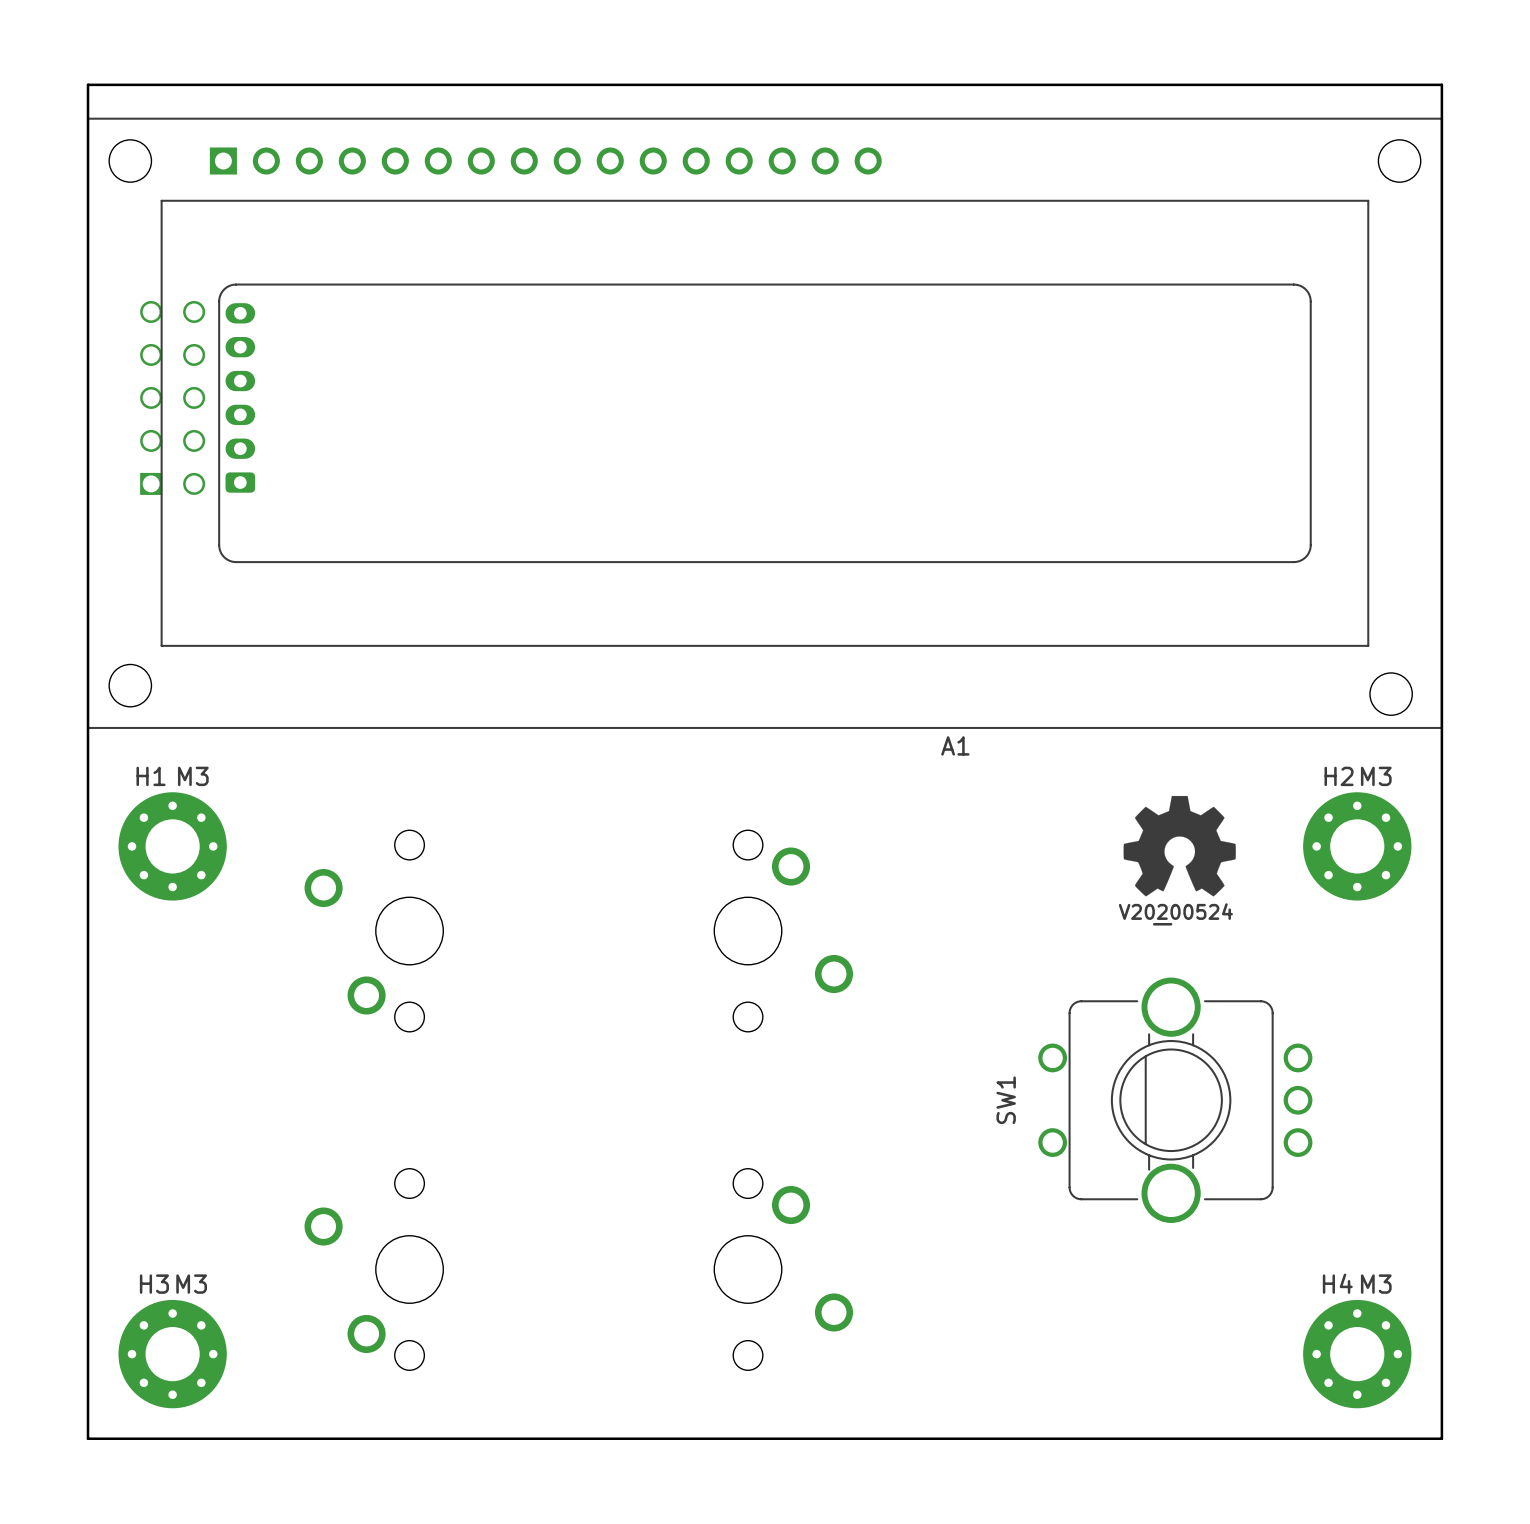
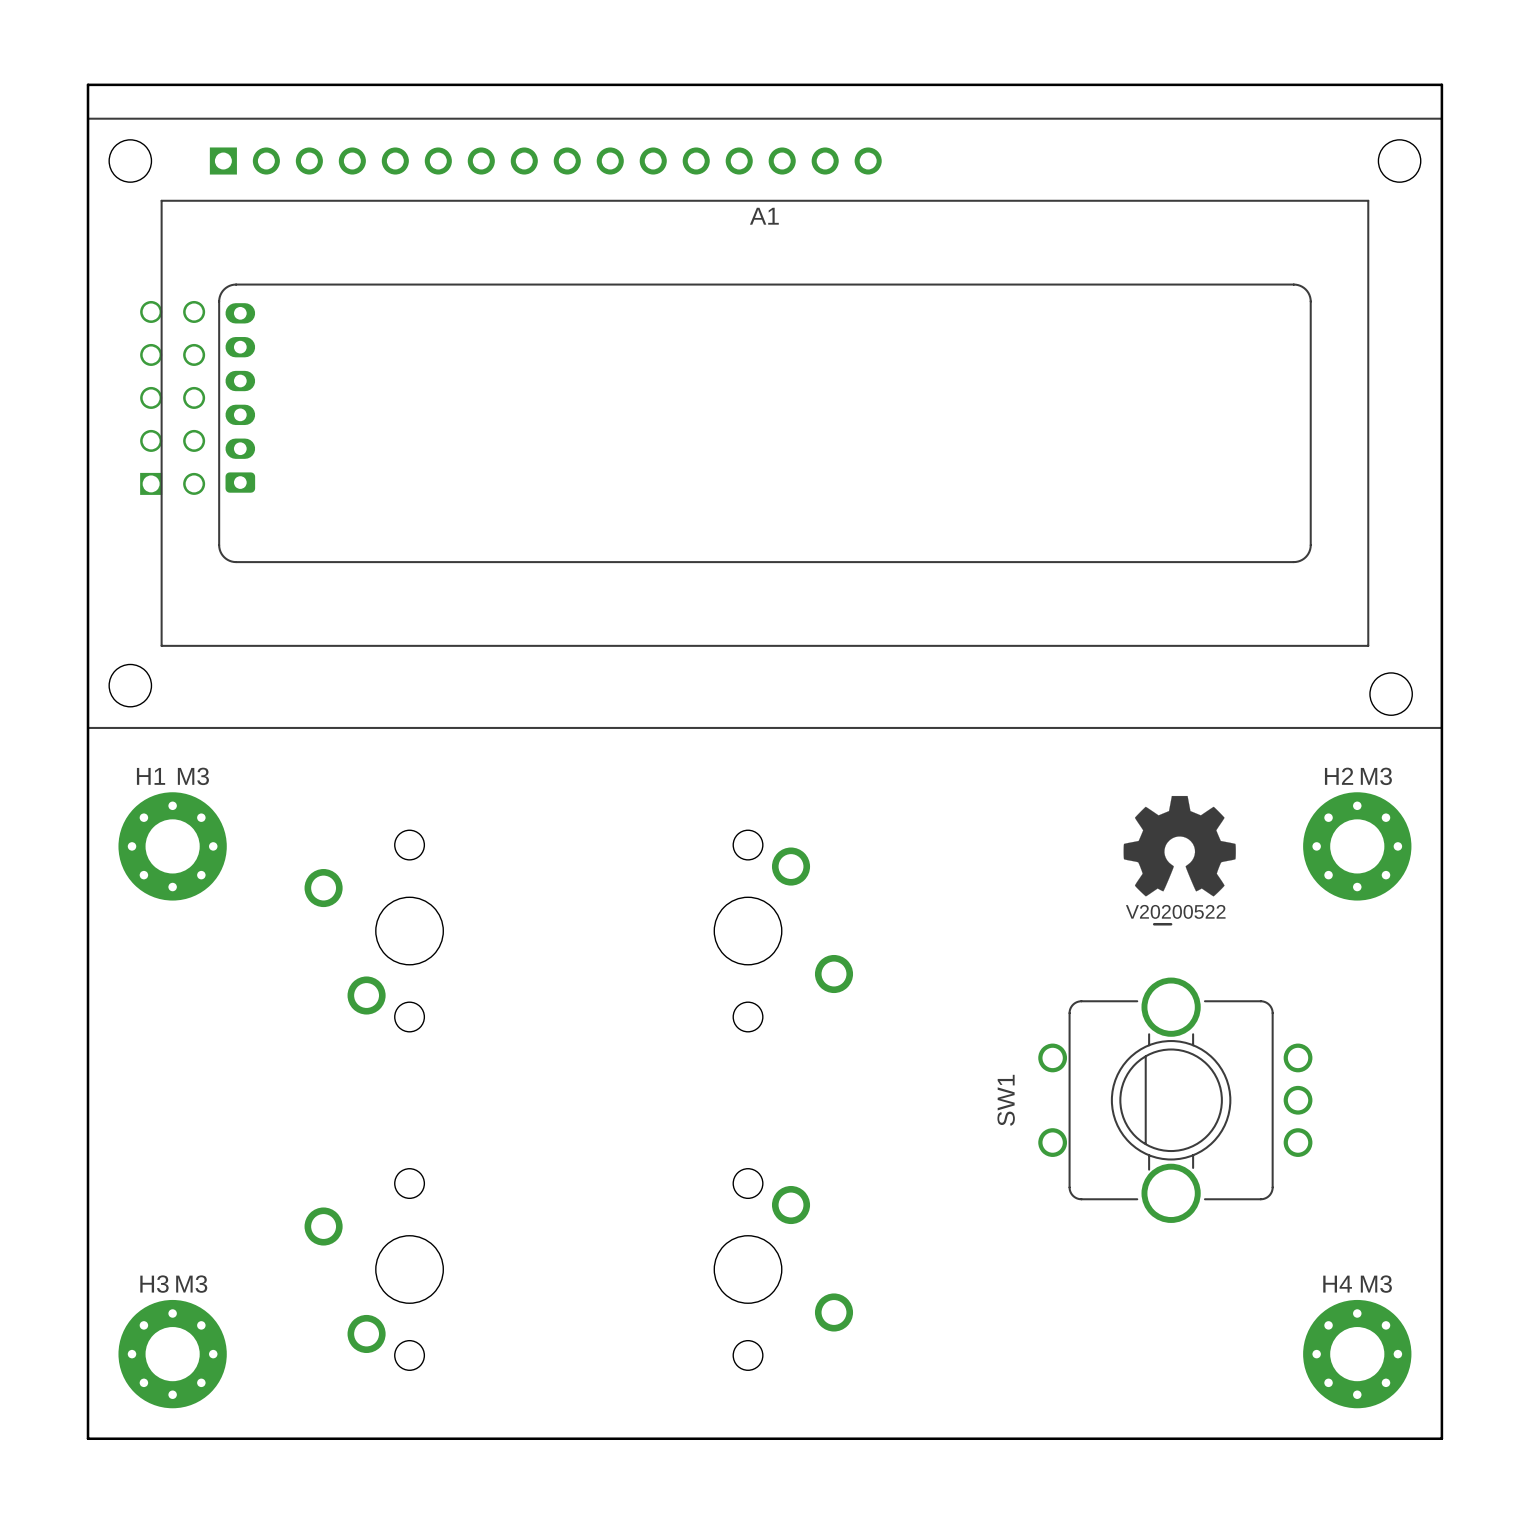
A1 name position: A1 (955, 745) -> A1 (764, 216)
drawing shape: [1118, 903, 1233, 926] -> [1125, 904, 1226, 926]

